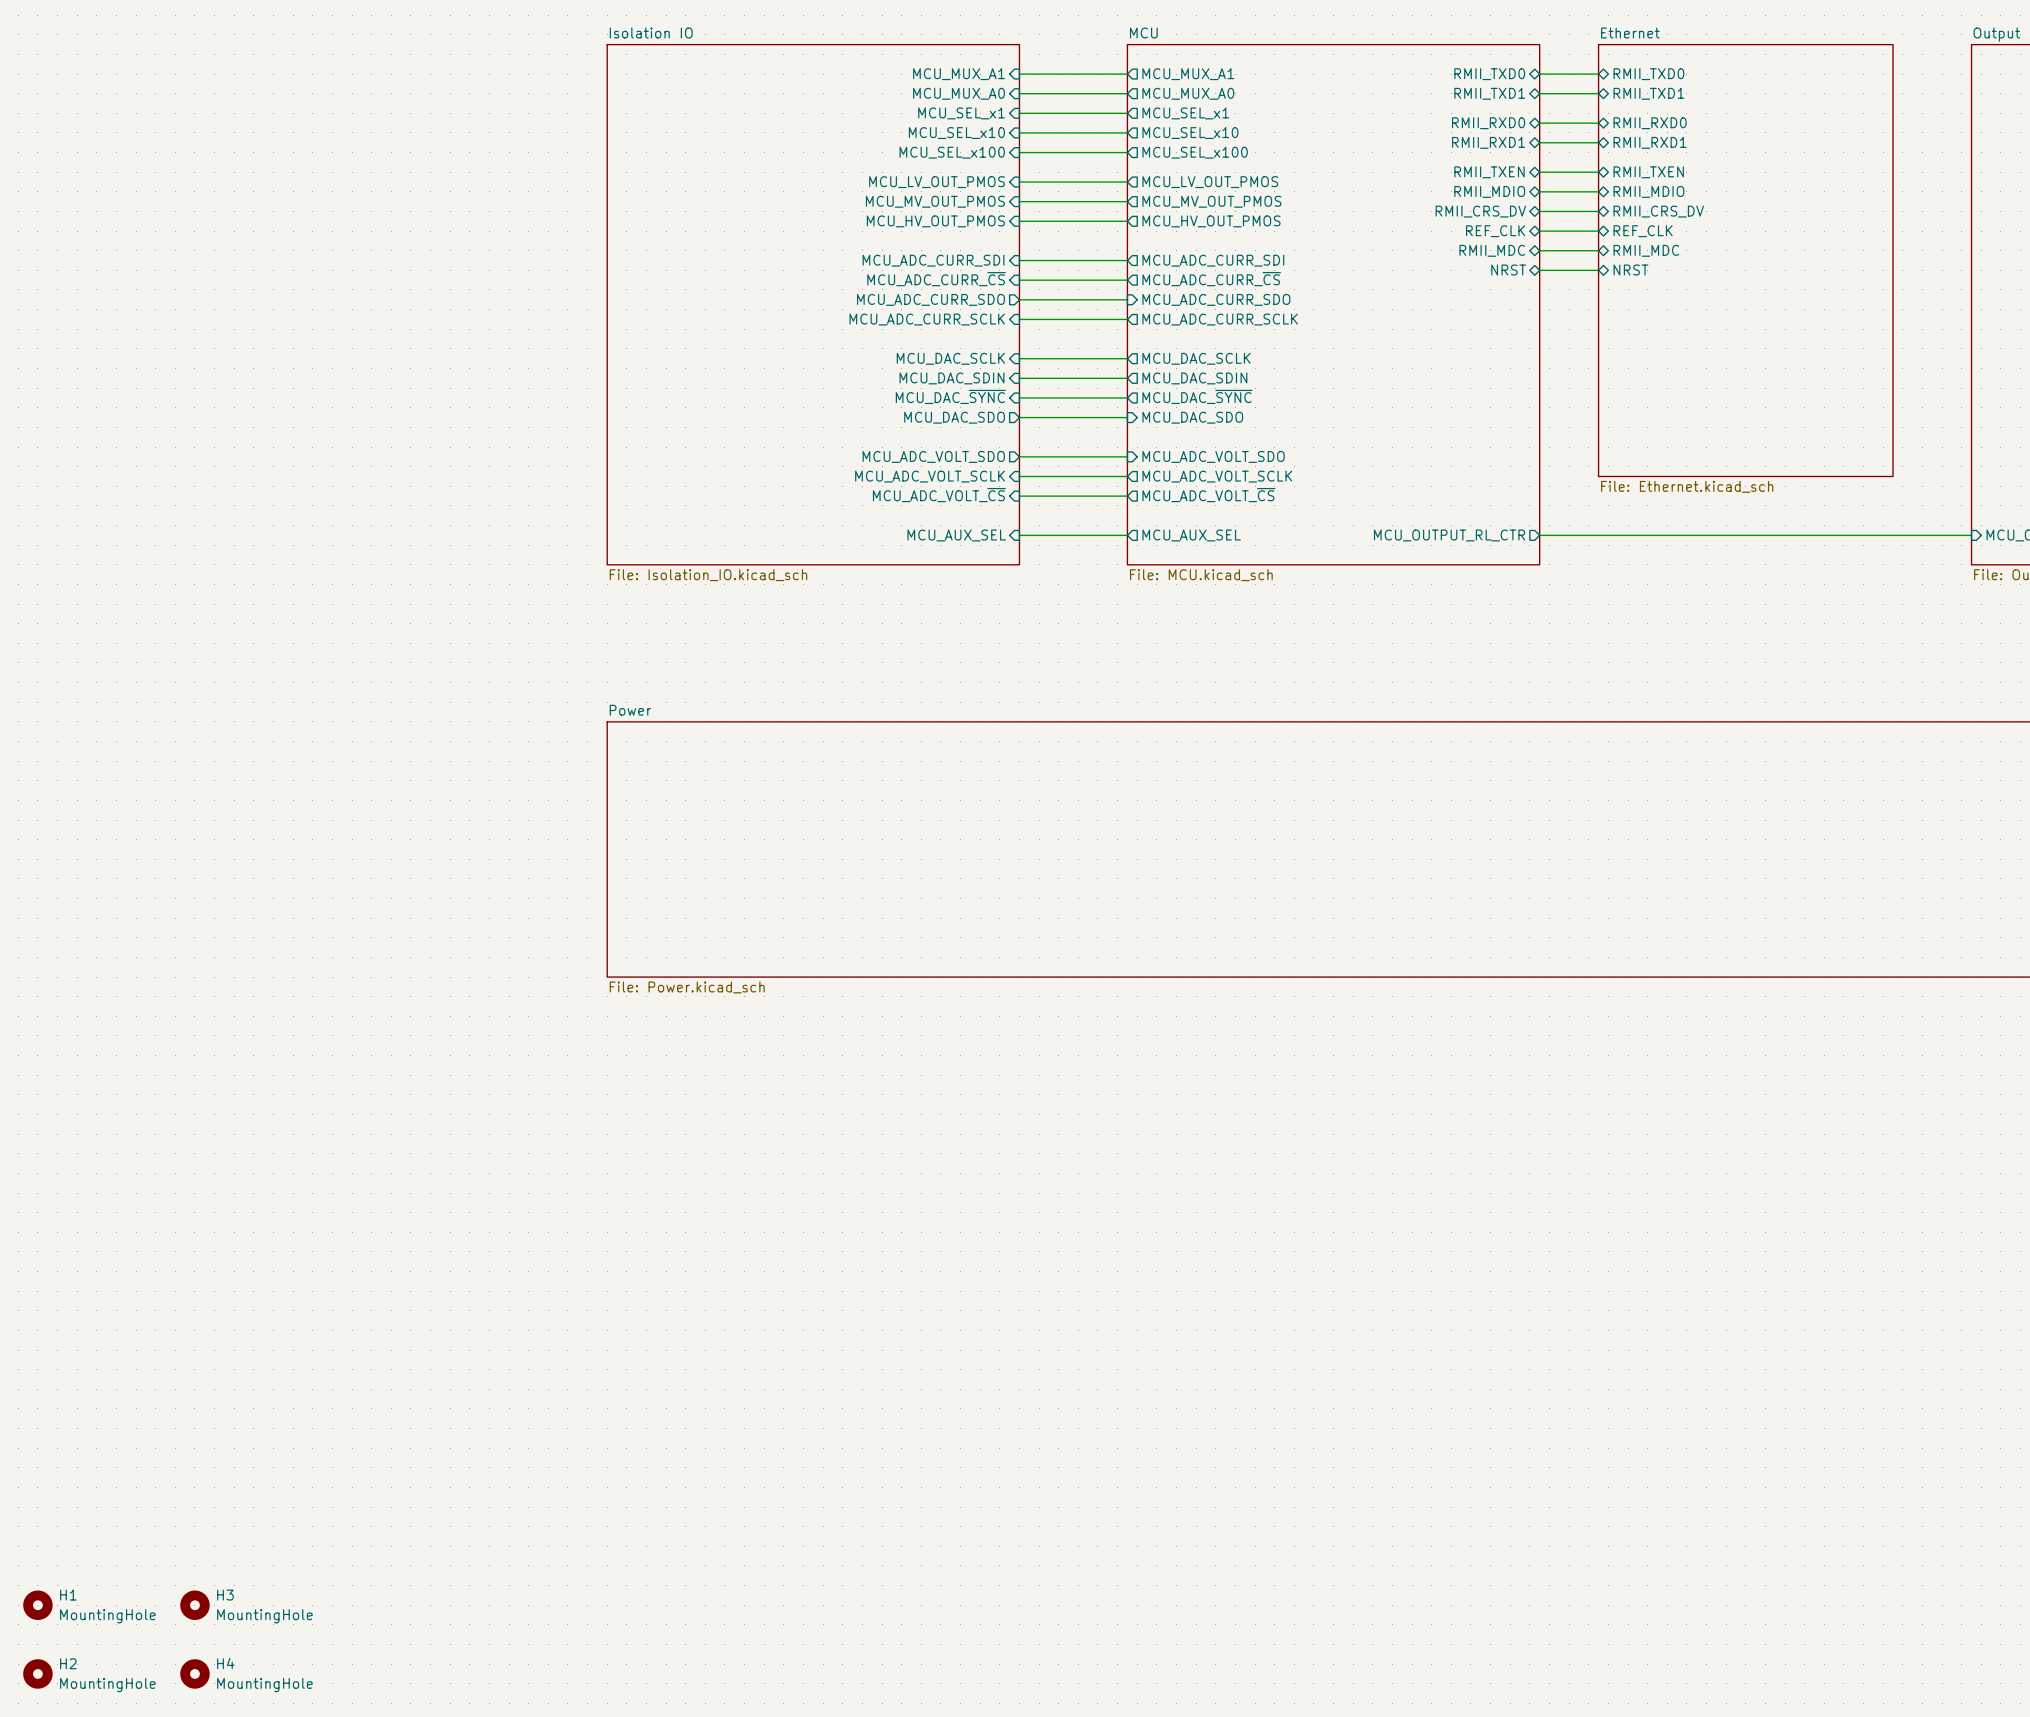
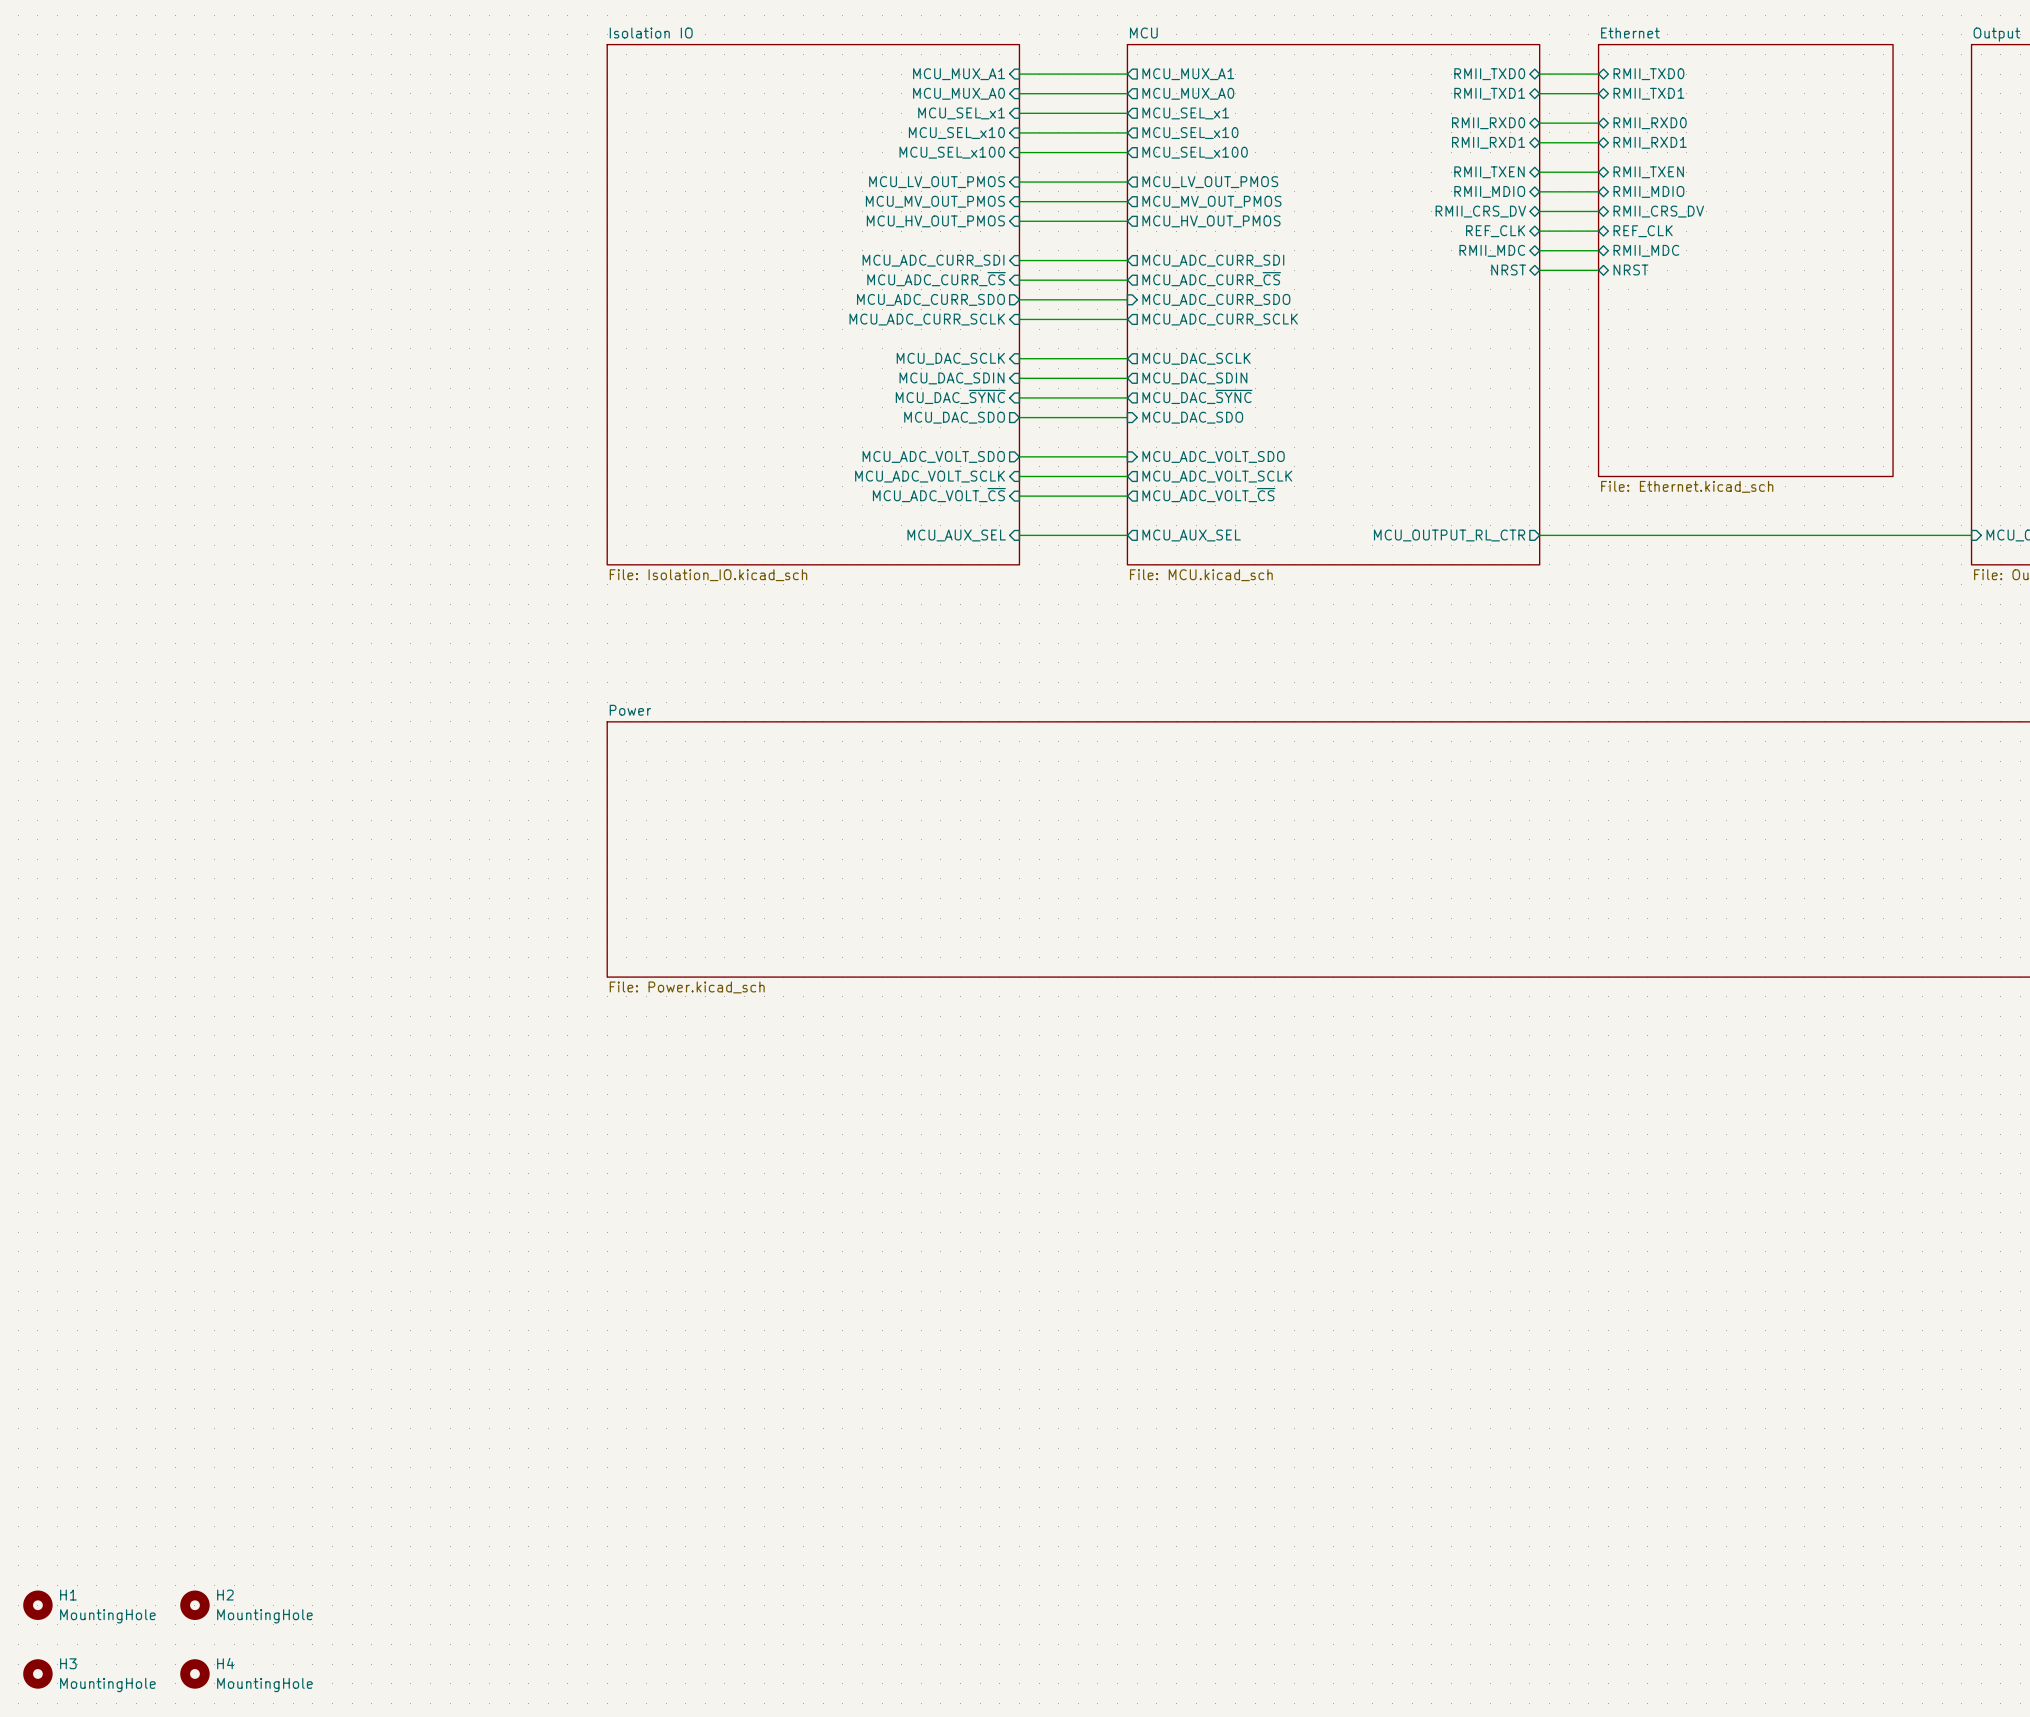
H3 name: H3 (225, 1595) -> H2 (225, 1595)
H2 name: H2 (68, 1663) -> H3 (68, 1663)

